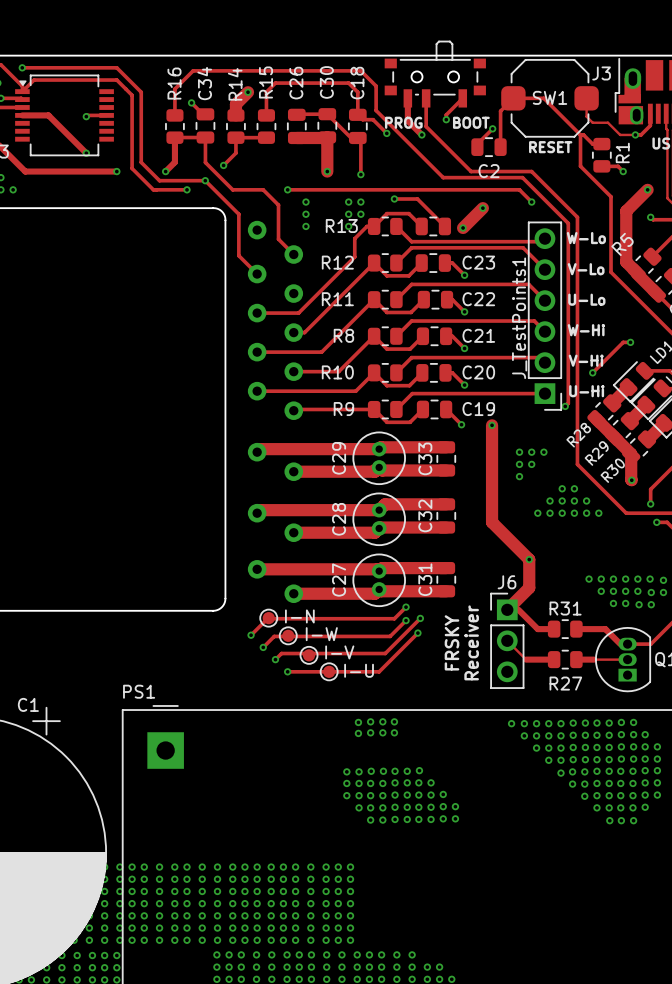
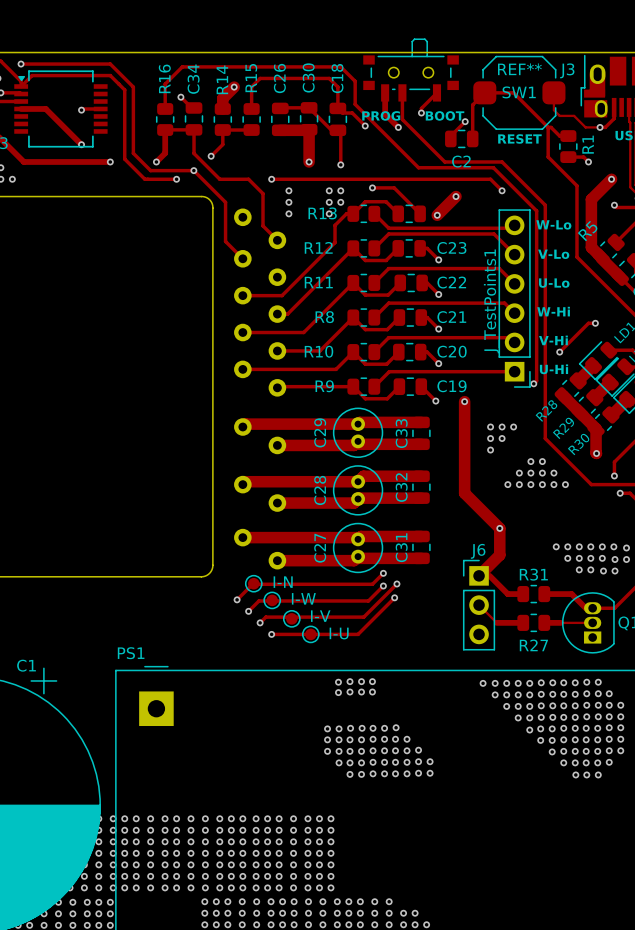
SW1 text: none -> REF** (519, 69)
text: FRSKY (451, 642) -> none
text: Receiver (471, 642) -> none

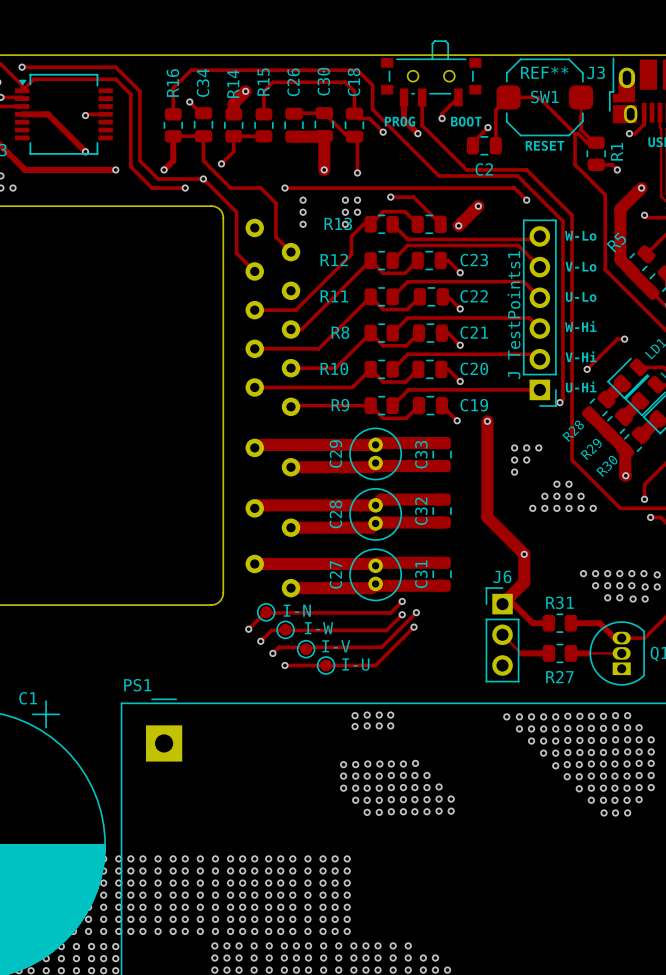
track: (553, 110) (559, 115) (574, 115) (585, 127) (600, 127) -> (581, 115) (581, 129) (593, 141)

